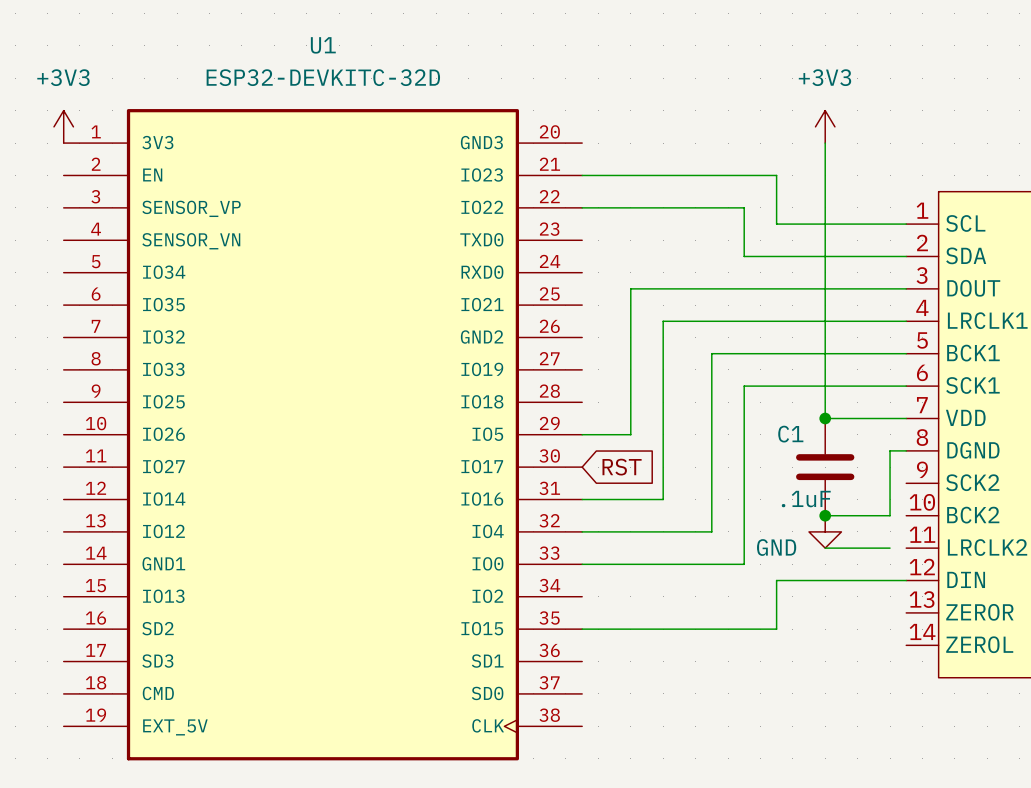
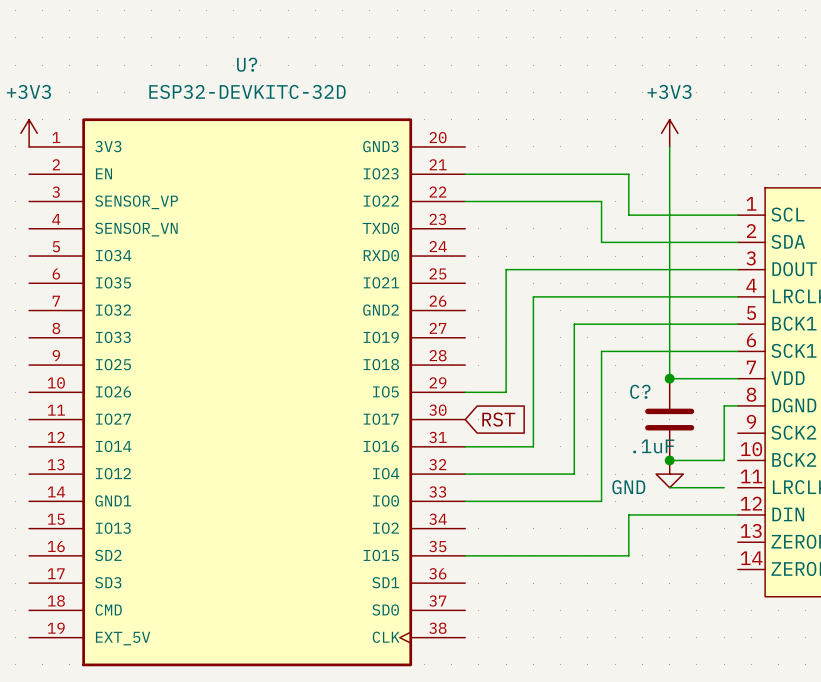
U1 name: U1 (323, 45) -> U? (247, 64)
C1 name: C1 (790, 434) -> C? (640, 391)

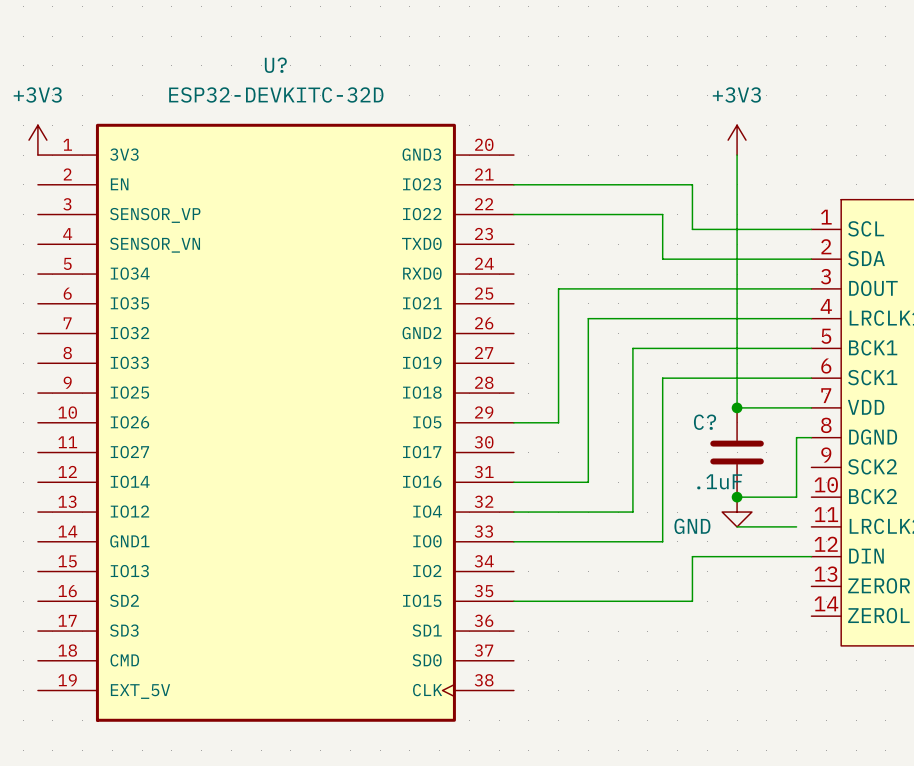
global label: RST (498, 419) -> none

